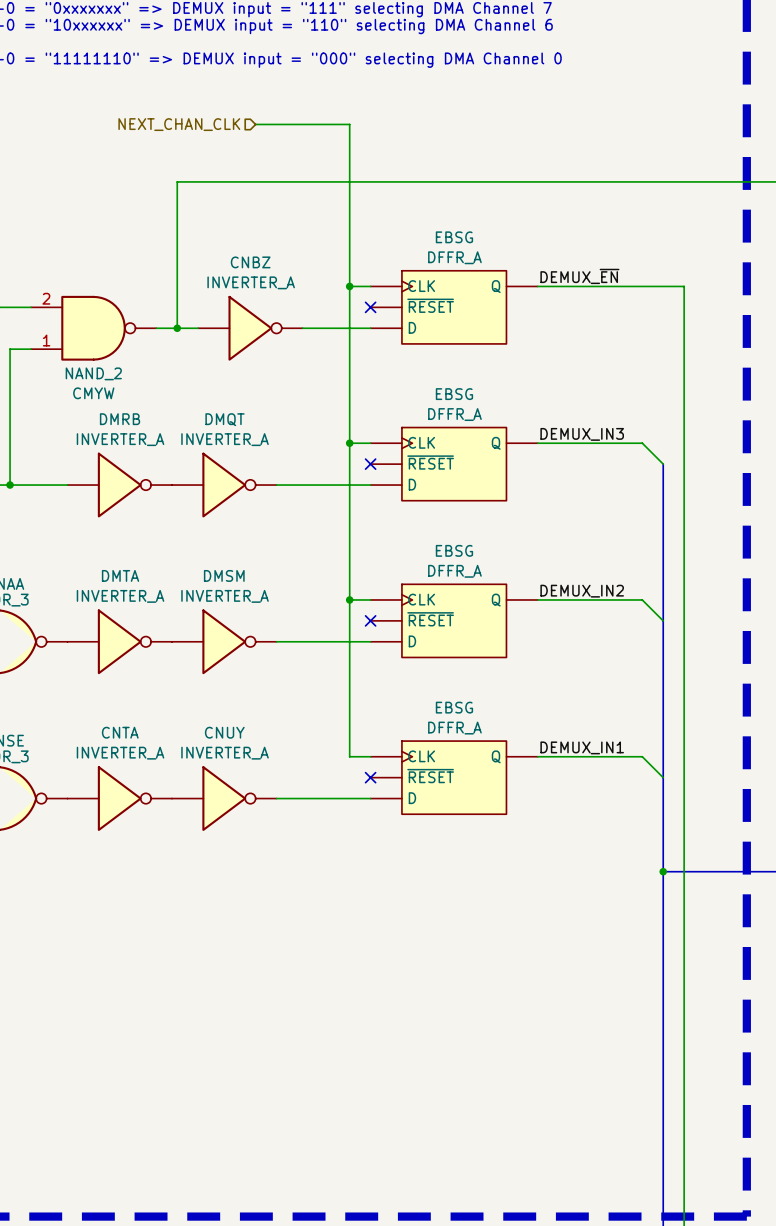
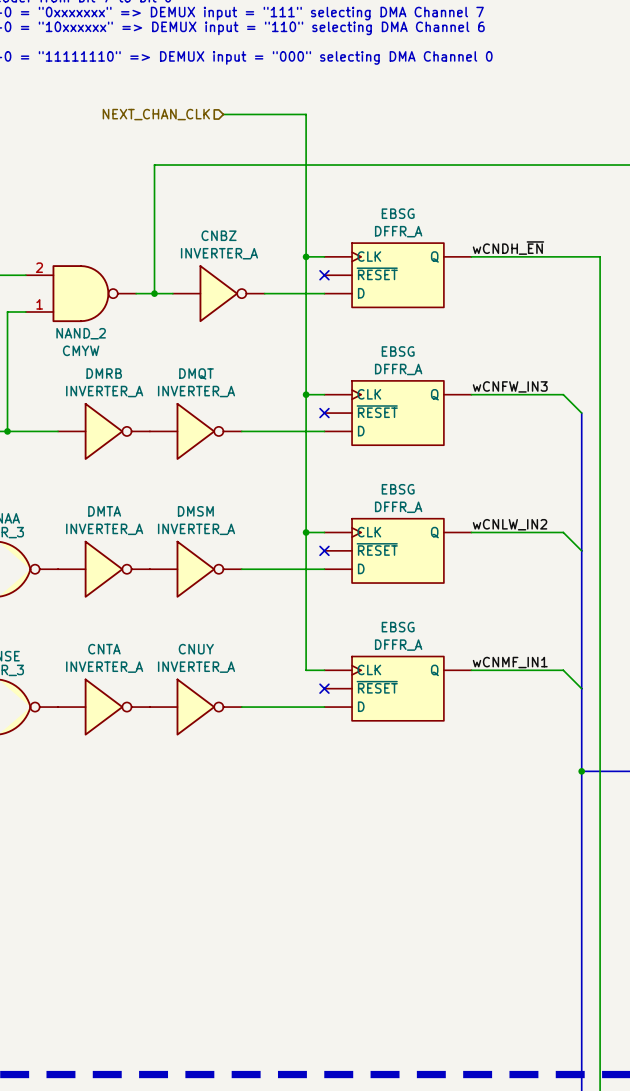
label: DEMUX_~{EN} (579, 276) -> wCNDH_~{EN} (508, 248)
label: DEMUX_IN3 (582, 434) -> wCNFW_IN3 (510, 386)
label: DEMUX_IN2 (582, 591) -> wCNLW_IN2 (510, 524)
label: DEMUX_IN1 (582, 747) -> wCNMF_IN1 (510, 662)

